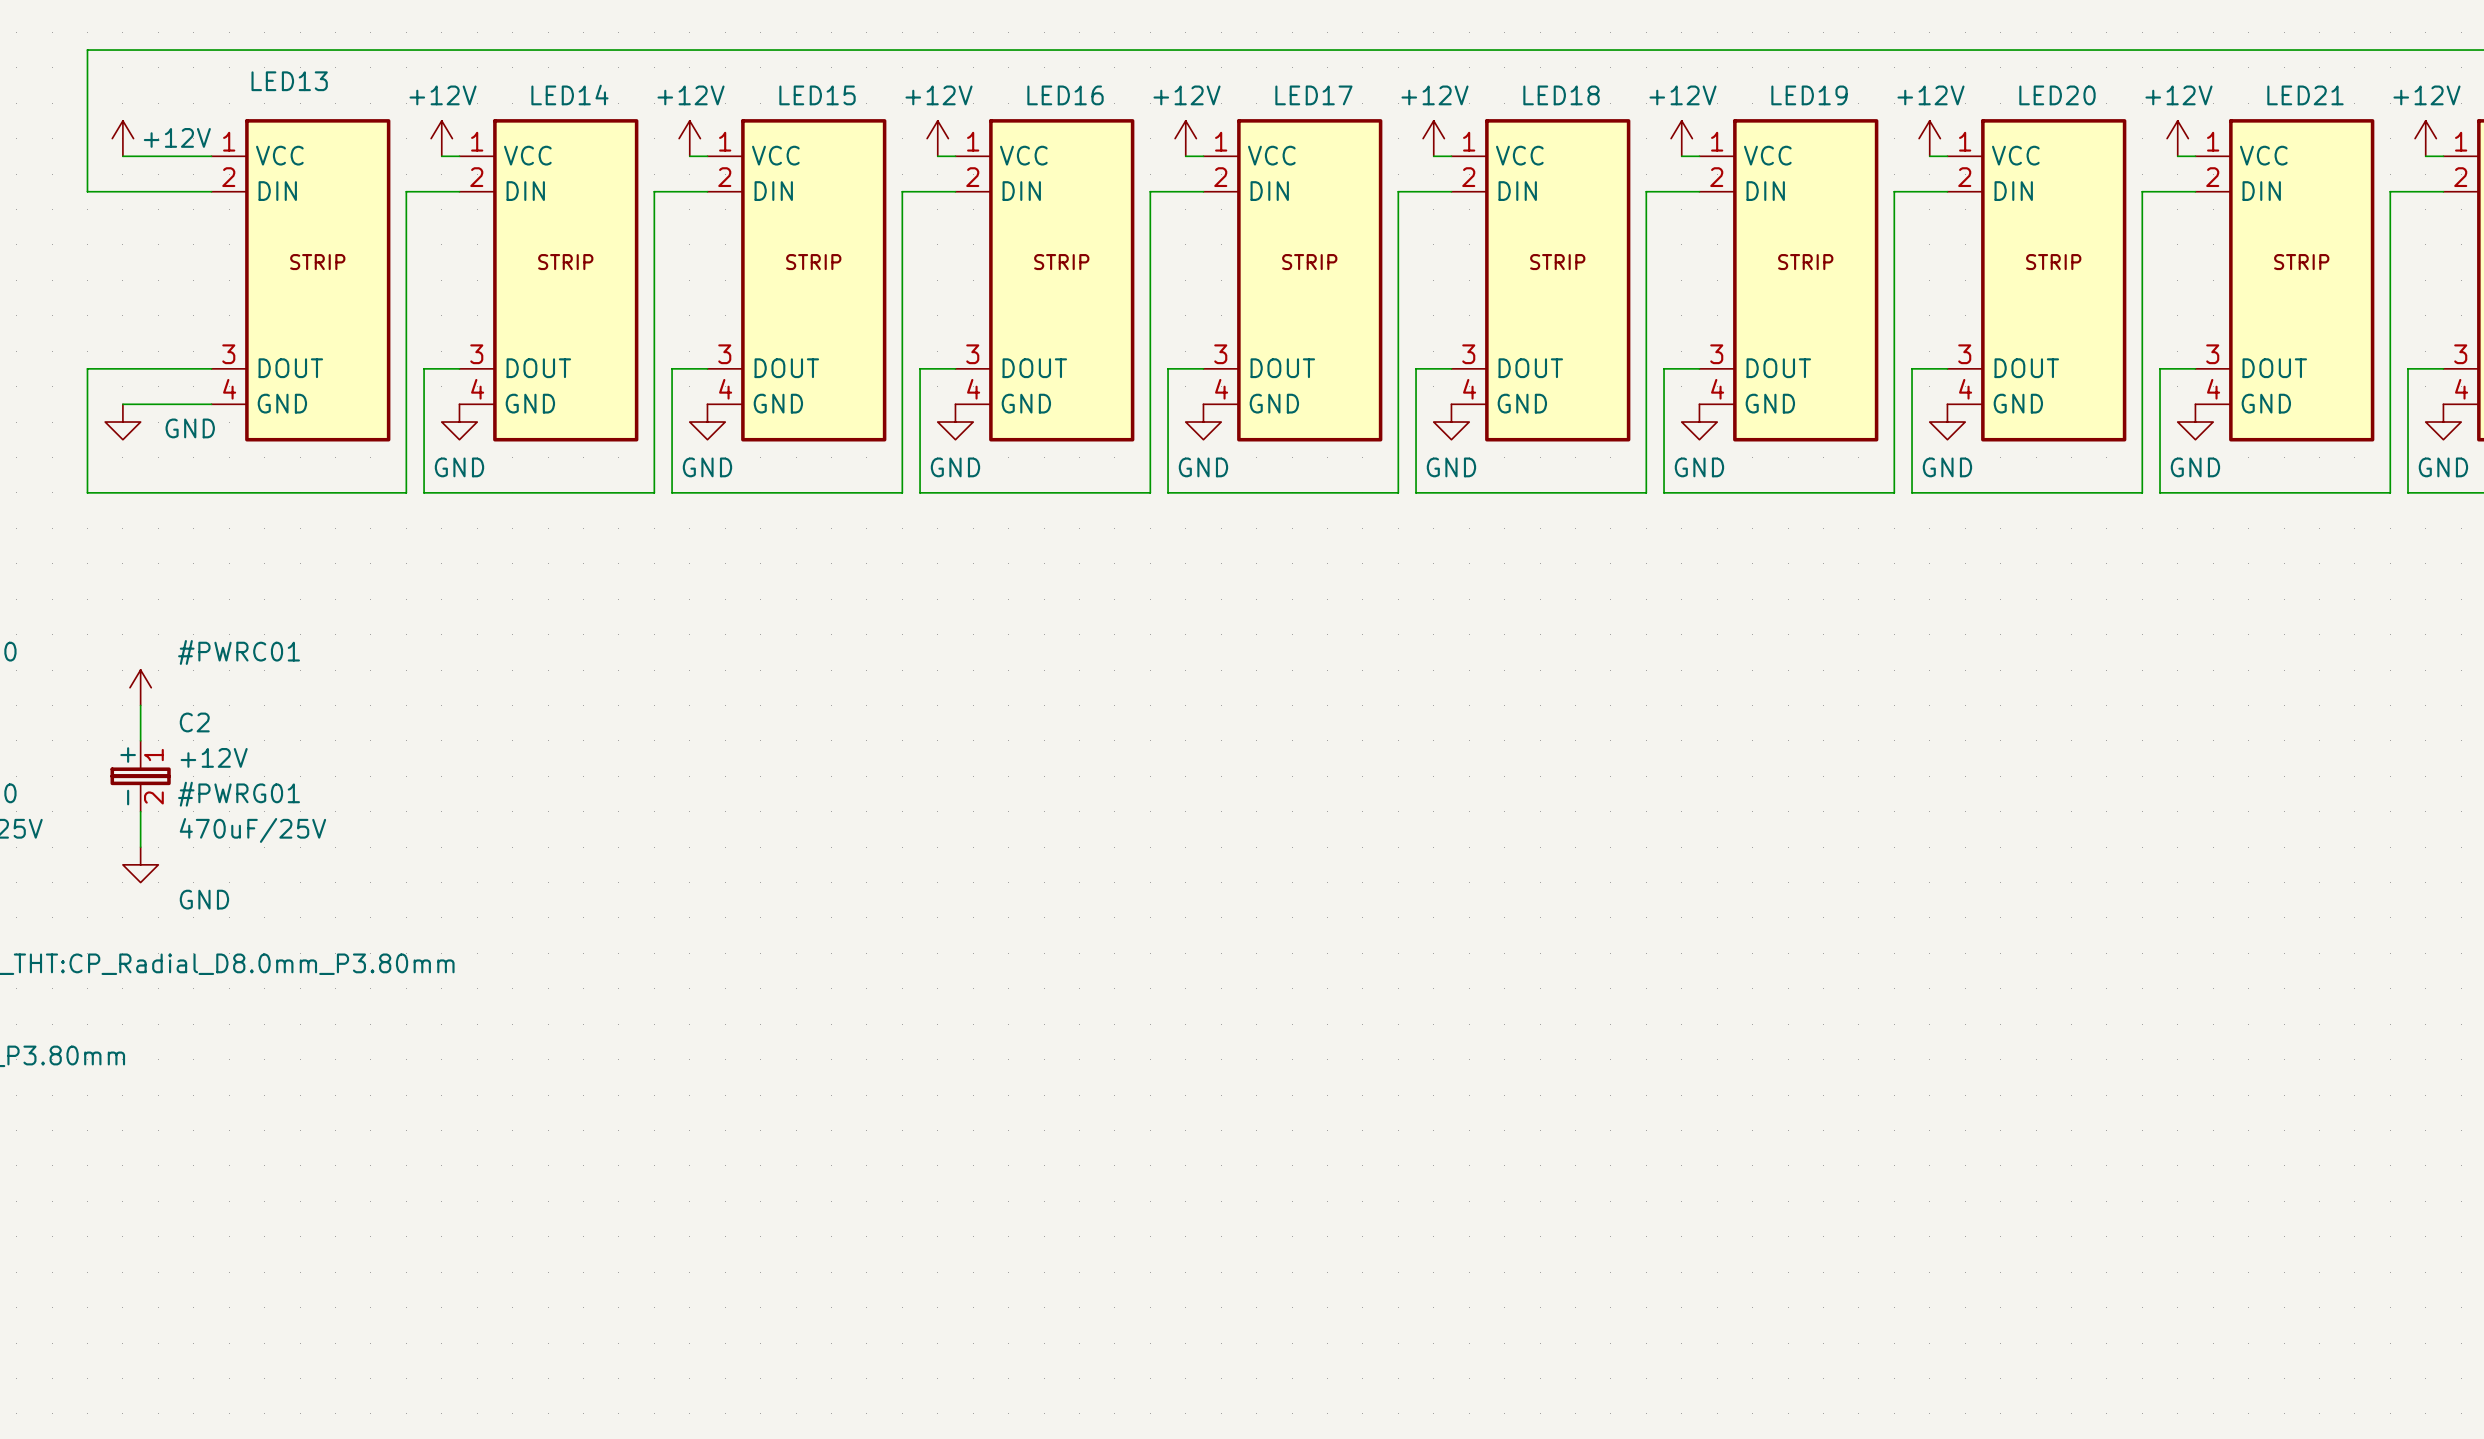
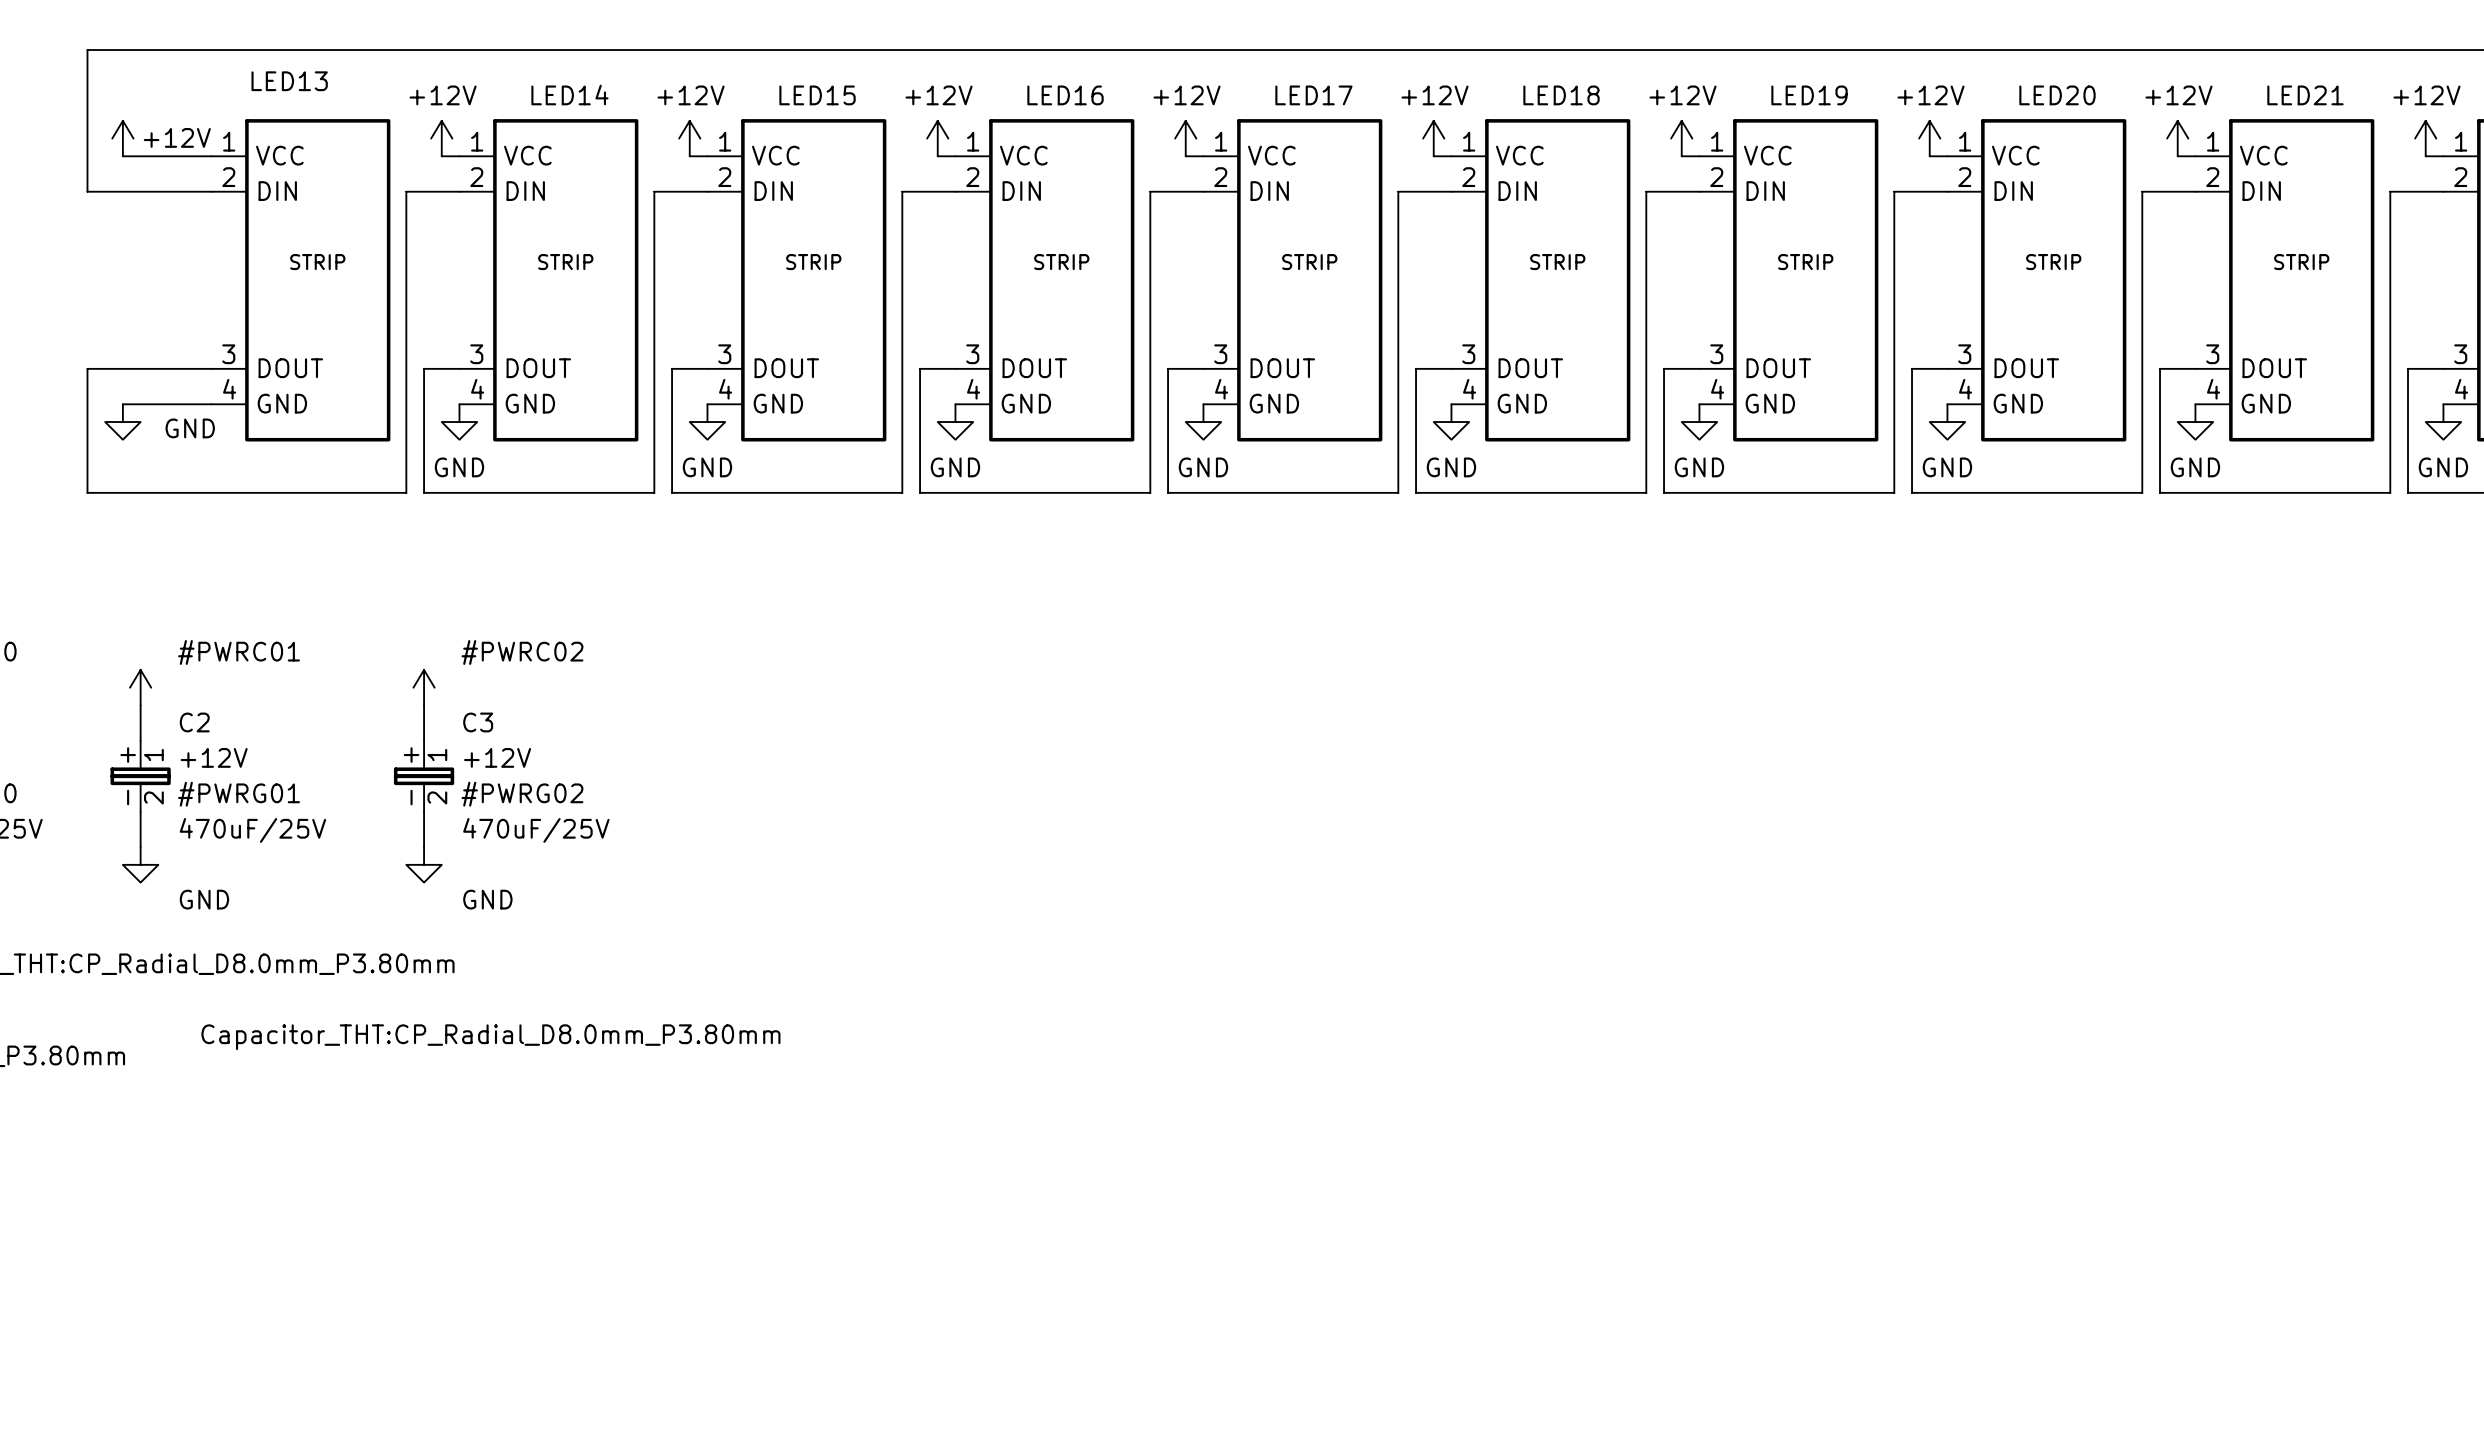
#PWRC02: none -> +12V (424, 687)
wire: none -> (424, 705) (424, 740)
C3: none -> 470uF/25V (424, 776)
wire: none -> (424, 811) (424, 847)
#PWRG02: none -> GND (424, 864)

